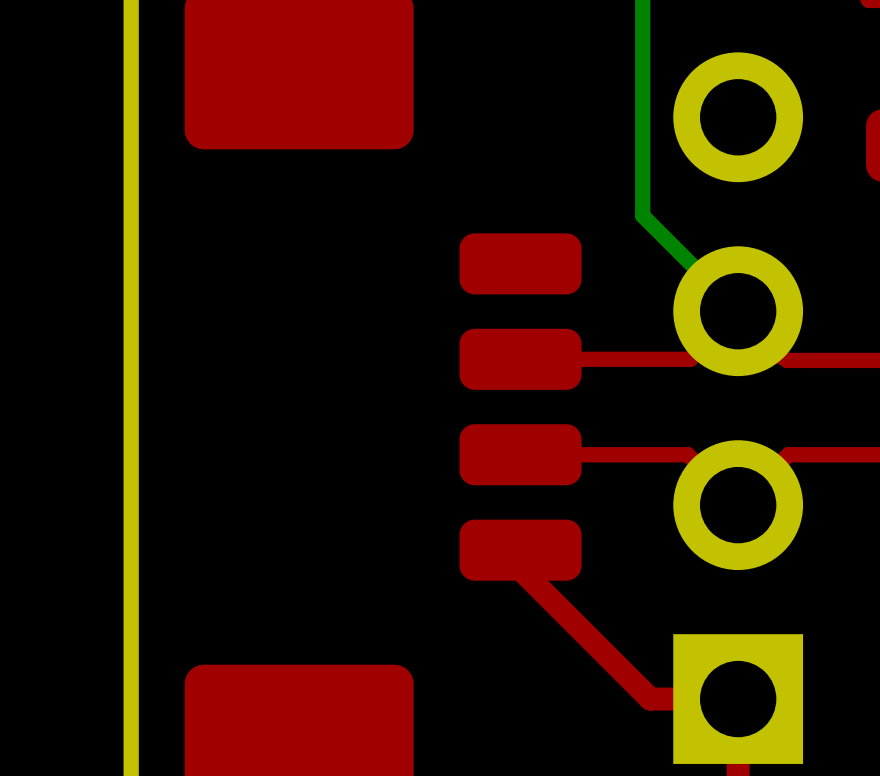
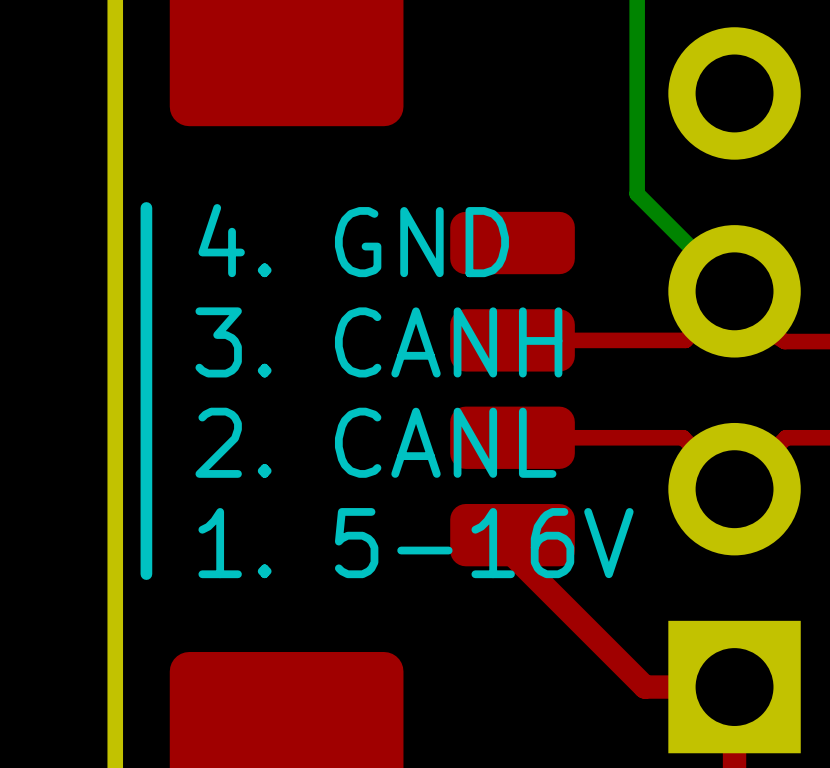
line: none -> (146, 207) (146, 574)
text: none -> 4. GND (353, 240)
text: none -> 3. CANH (378, 342)
text: none -> 2. CANL (375, 442)
text: none -> 1. 5-16V (416, 543)

